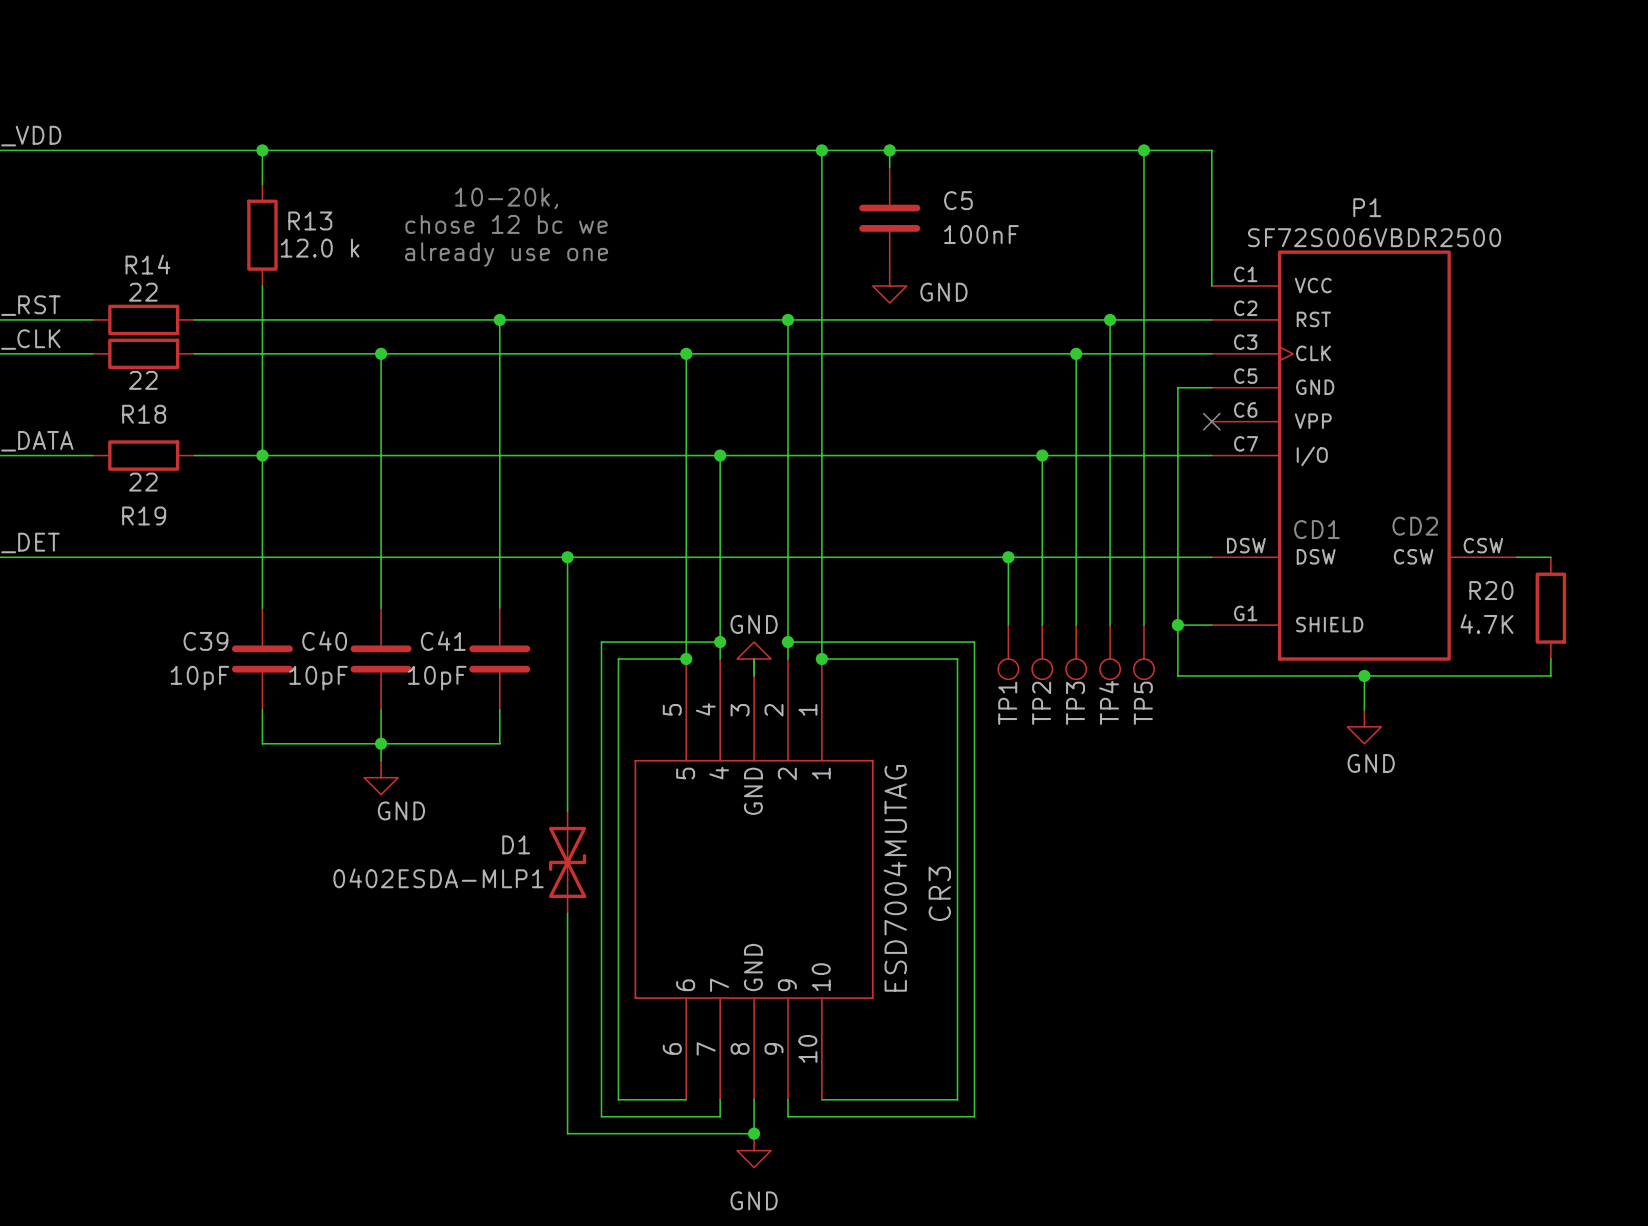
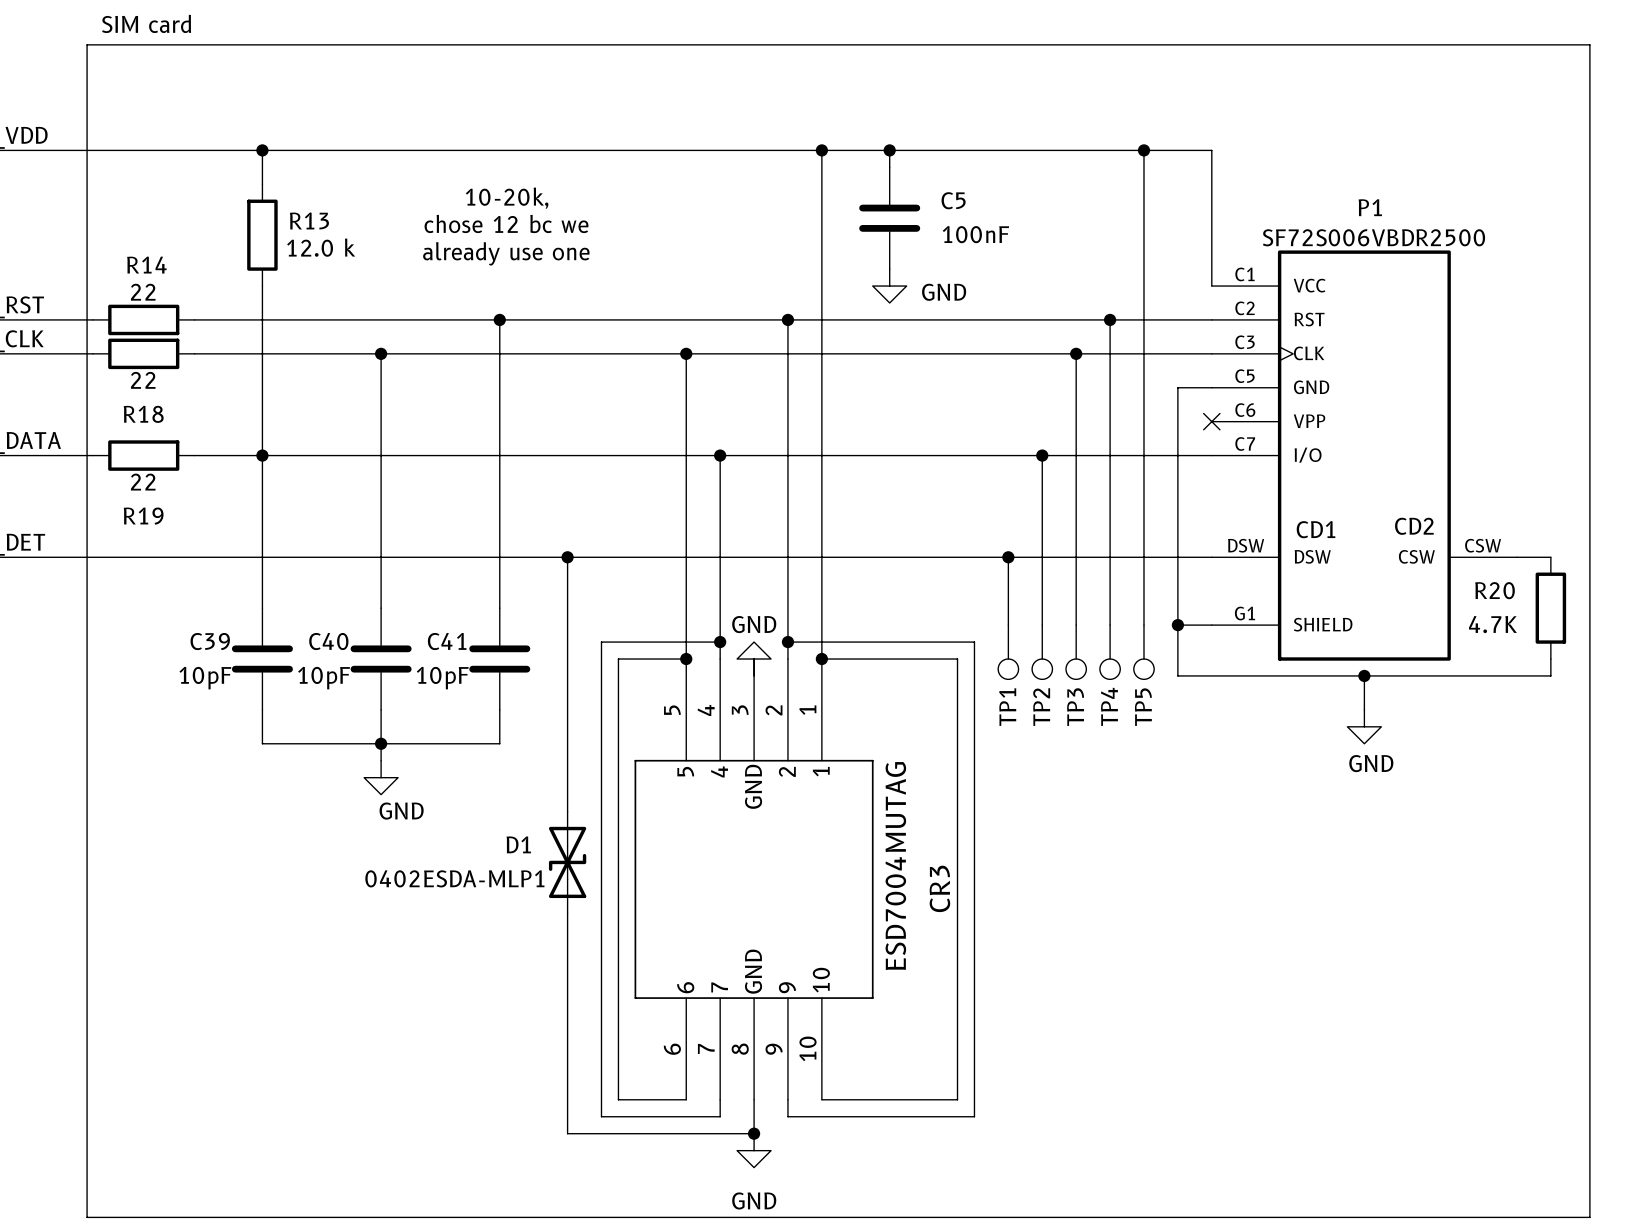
text: none -> SIM card (146, 23)
line: none -> (87, 44) (1589, 44) (1589, 1217) (87, 1217) (87, 44)

